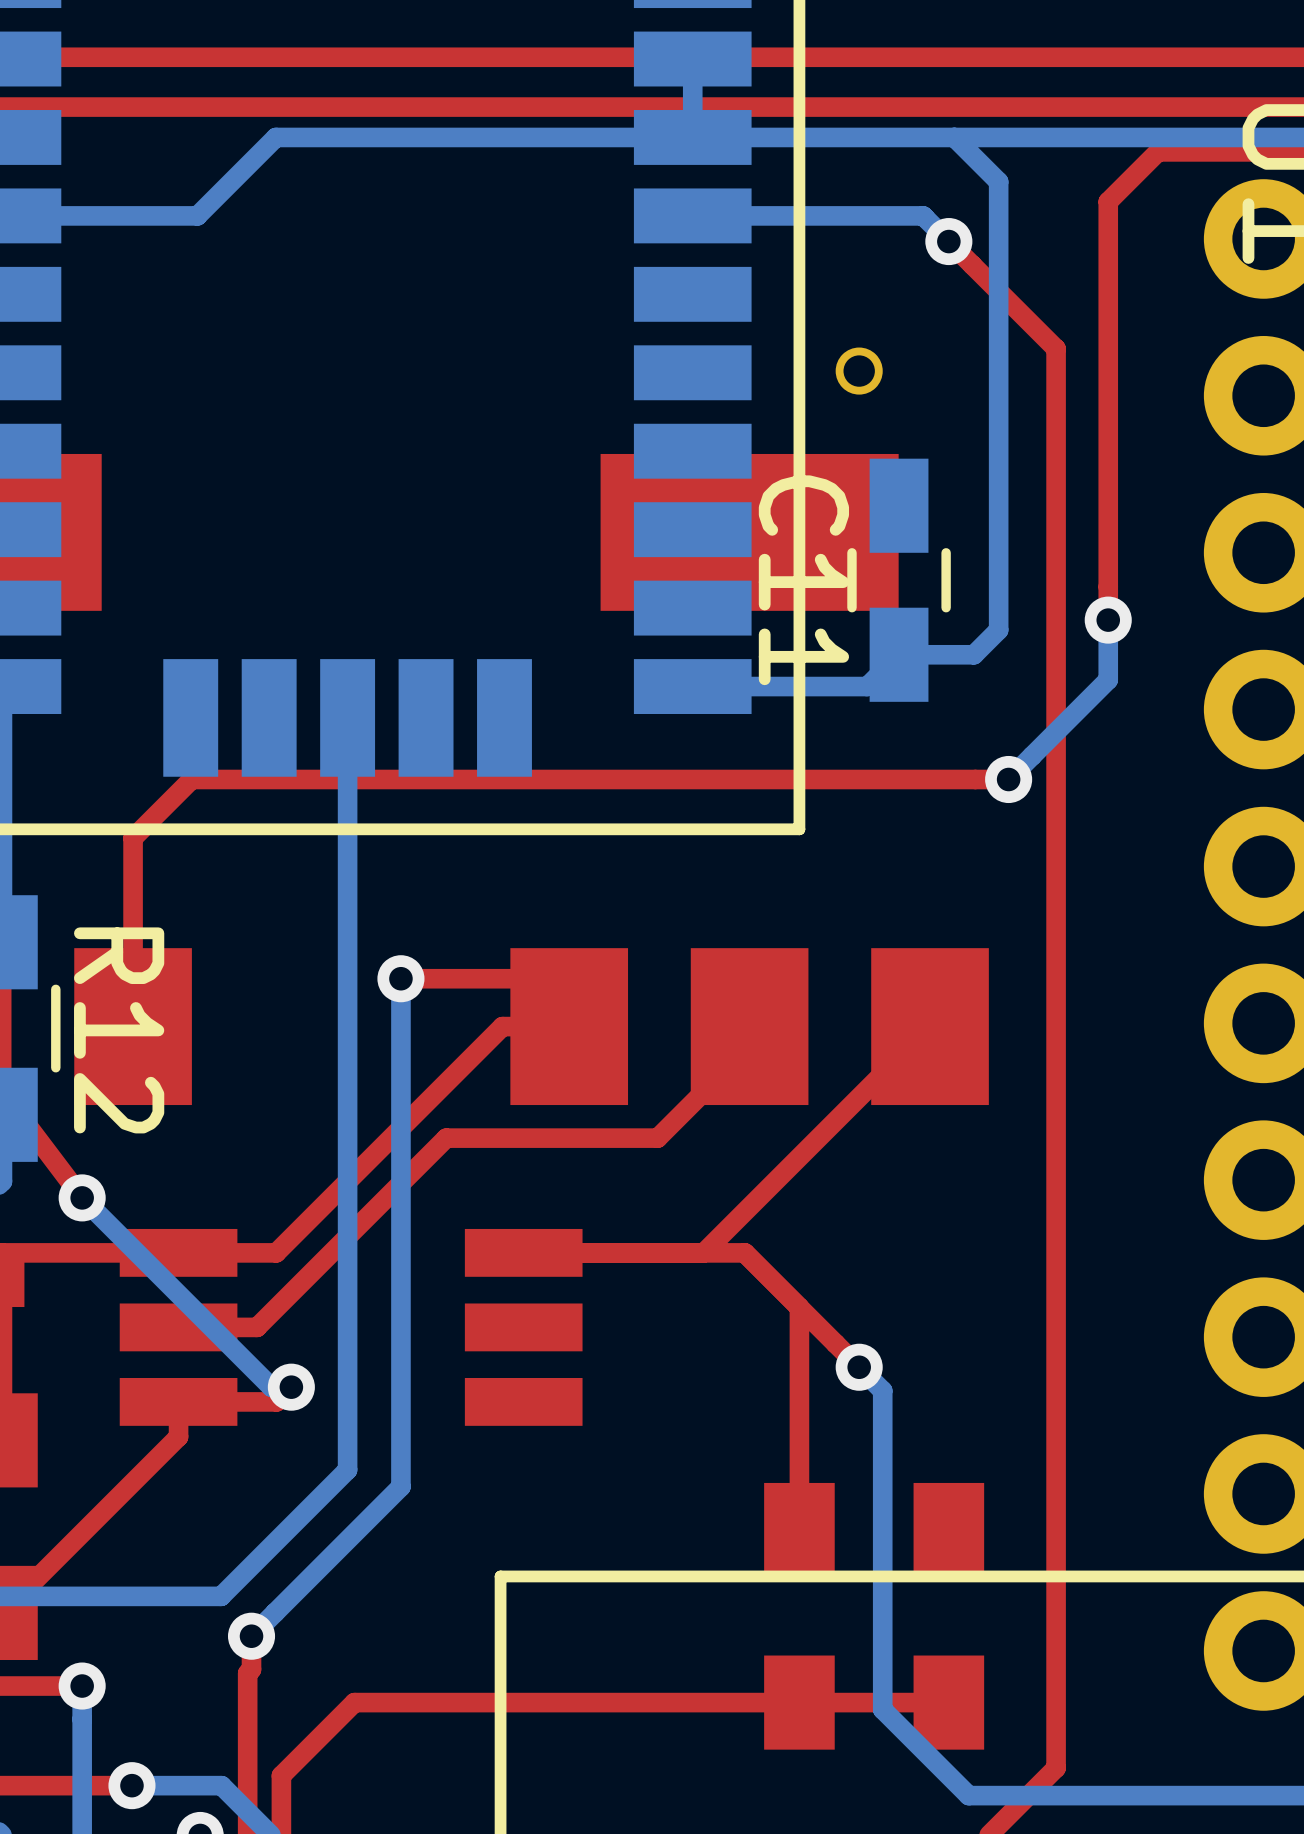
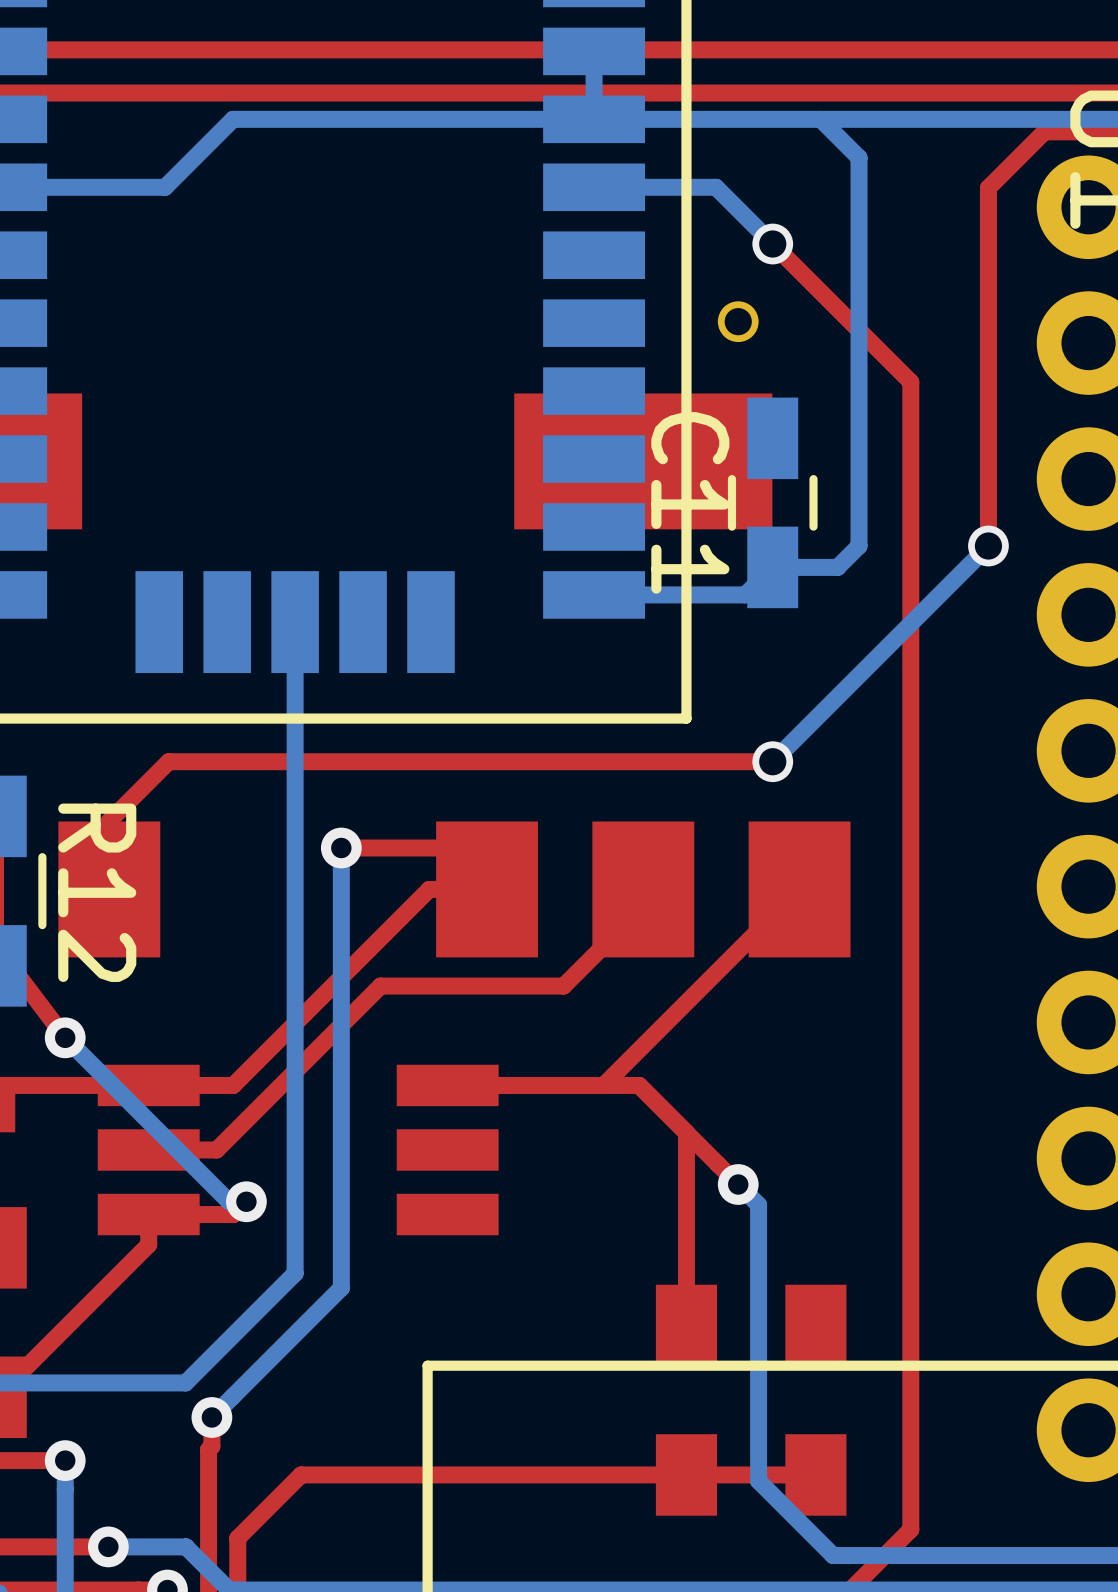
top track: (1212, 151) (1158, 151) (1108, 201) (1108, 620) -> (1044, 131) (988, 187) (988, 546)
bottom track: (833, 215) (923, 215) (948, 241) -> (716, 187) (772, 244)
top track: (948, 241) (1056, 348) (1056, 1768) -> (772, 244) (910, 382) (910, 1529) (908, 1531)
via: (948, 241) -> none
via: none -> (772, 244)
bottom track: (1108, 620) (1108, 679) (1008, 779) -> none
via position: (1108, 620) -> (988, 546)
bottom track: none -> (988, 546) (772, 761)
top track: (1008, 779) (191, 779) (133, 838) (133, 947) -> (772, 761) (168, 761) (109, 821)
via: (1008, 779) -> none
via: none -> (772, 761)

